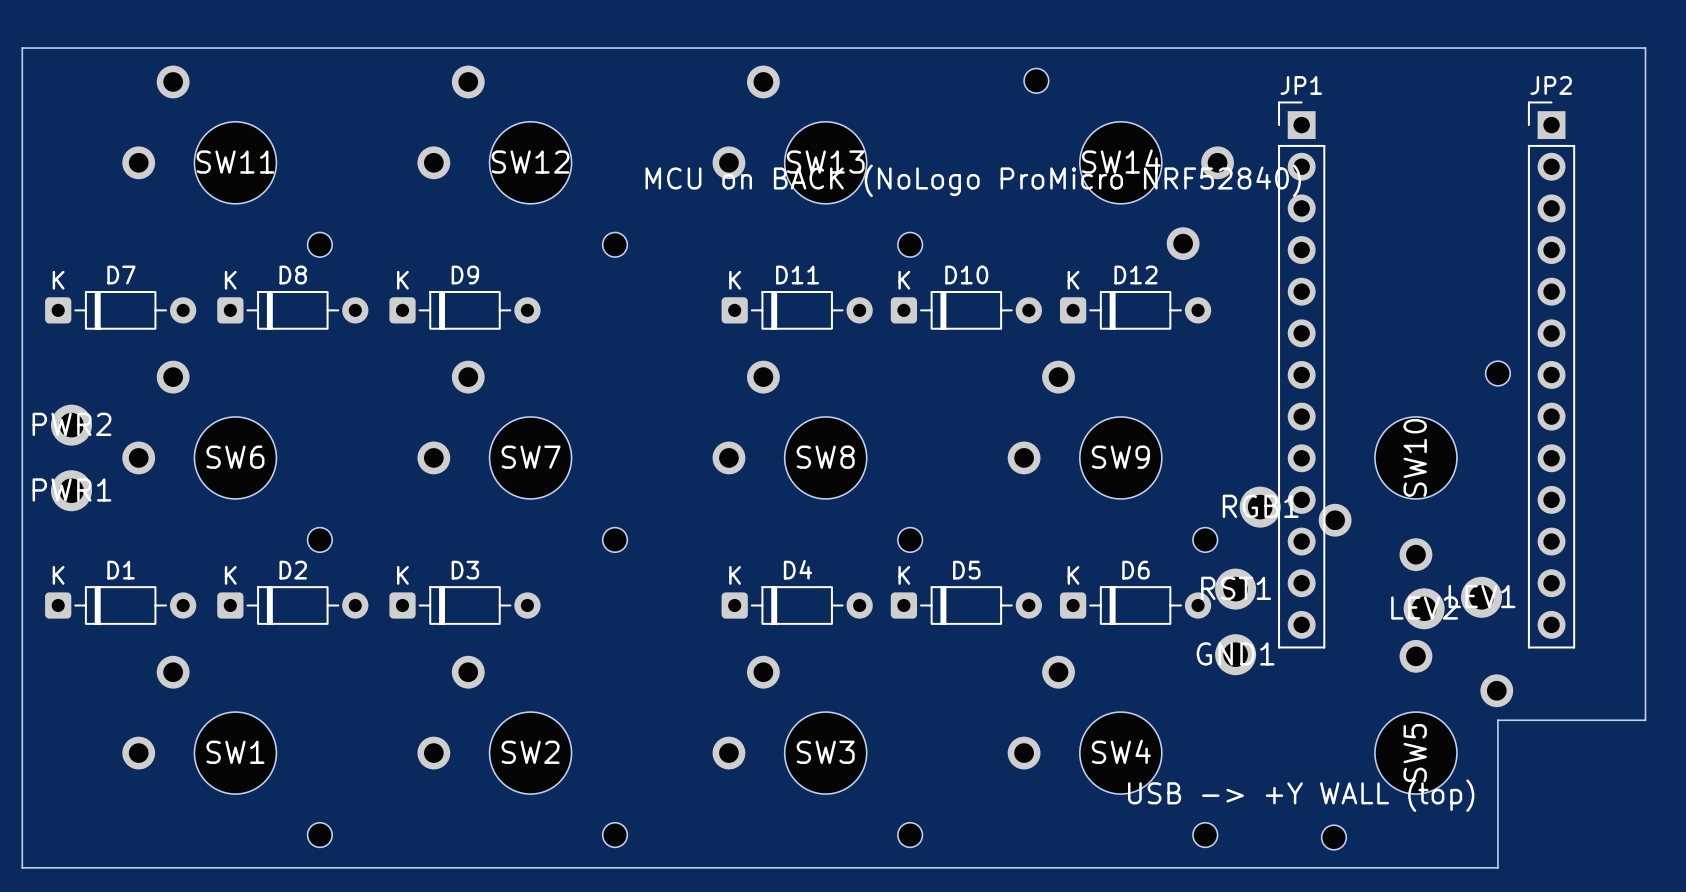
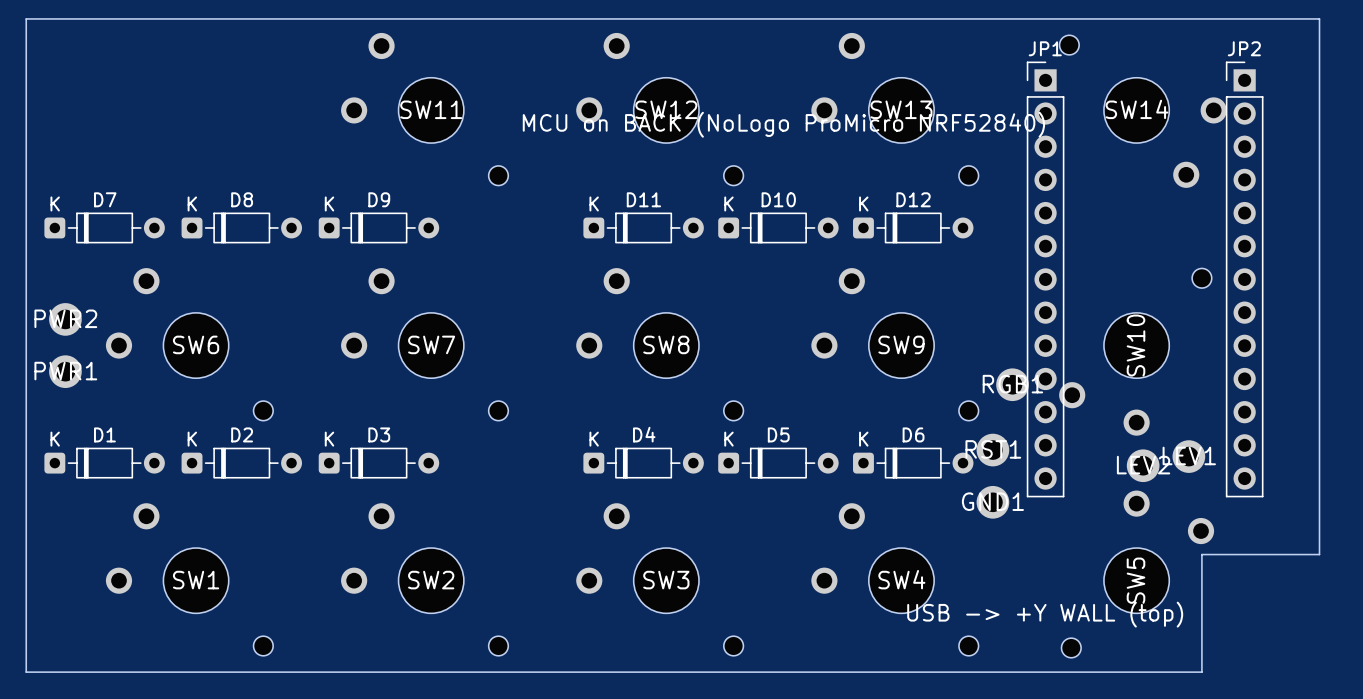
SW11: (227, 161) -> none
SW13: none -> (894, 109)
SW12 name: SW12 (530, 162) -> SW11 (431, 109)
SW13 name: SW13 (825, 162) -> SW12 (666, 109)
SW14 position: (1129, 164) -> (1143, 111)

